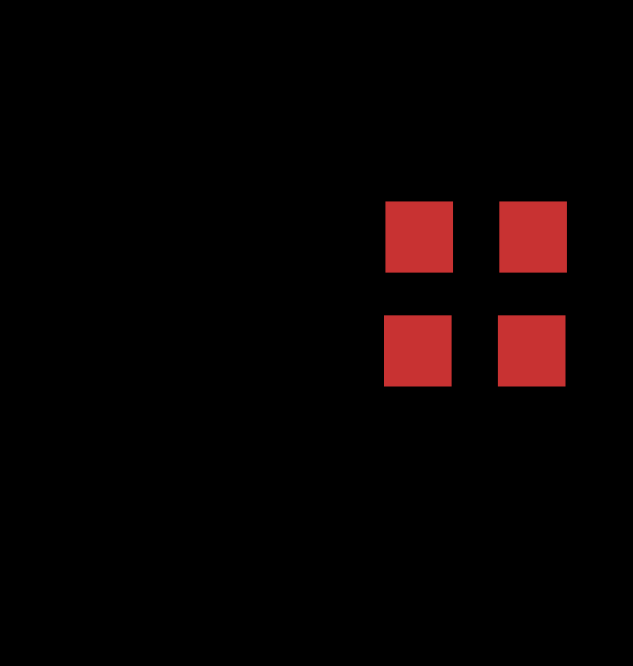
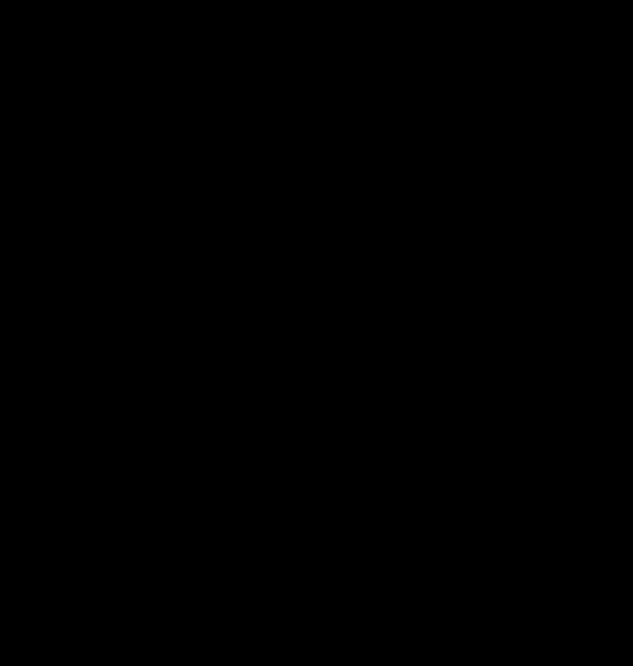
part: (476, 237) -> none
part: (474, 350) -> none

